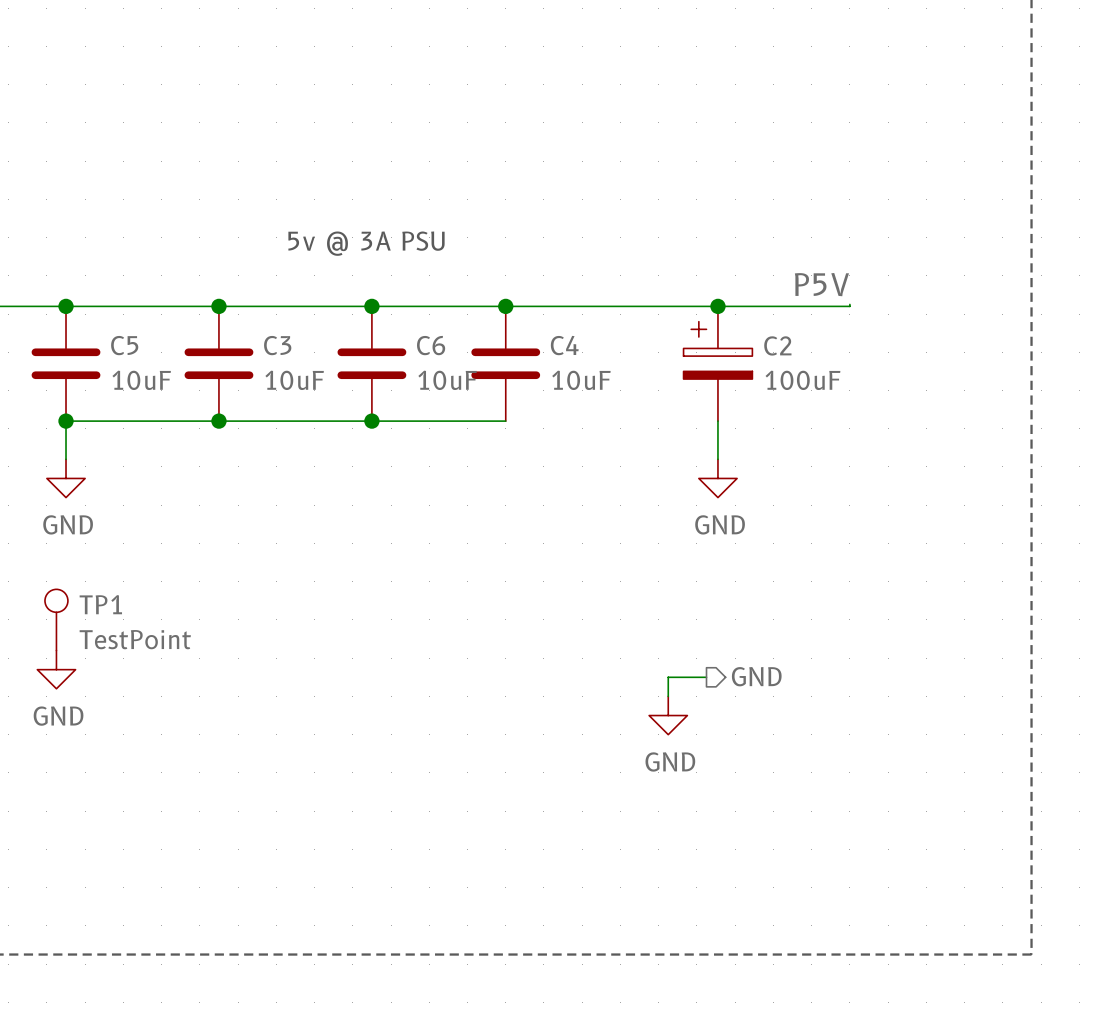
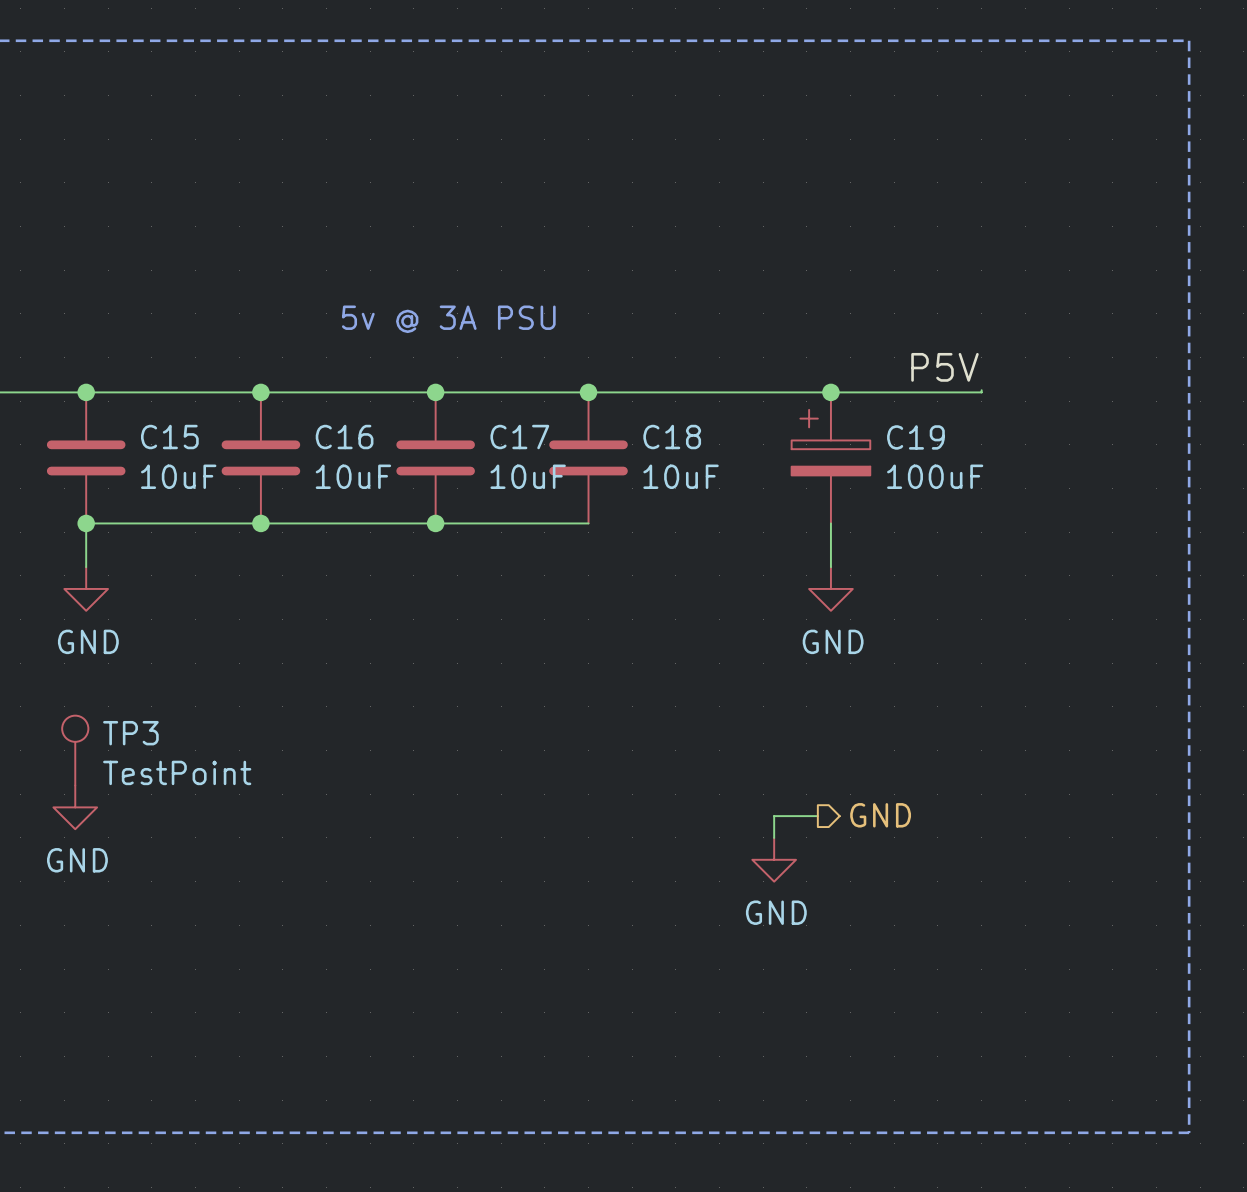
C5 name: C5 (124, 345) -> C15 (169, 437)
C3 name: C3 (277, 345) -> C16 (344, 437)
C6 name: C6 (431, 345) -> C17 (519, 437)
C4 name: C4 (564, 345) -> C18 (672, 437)
C2 name: C2 (777, 345) -> C19 (915, 437)
TP1 name: TP1 (100, 604) -> TP3 (130, 733)

